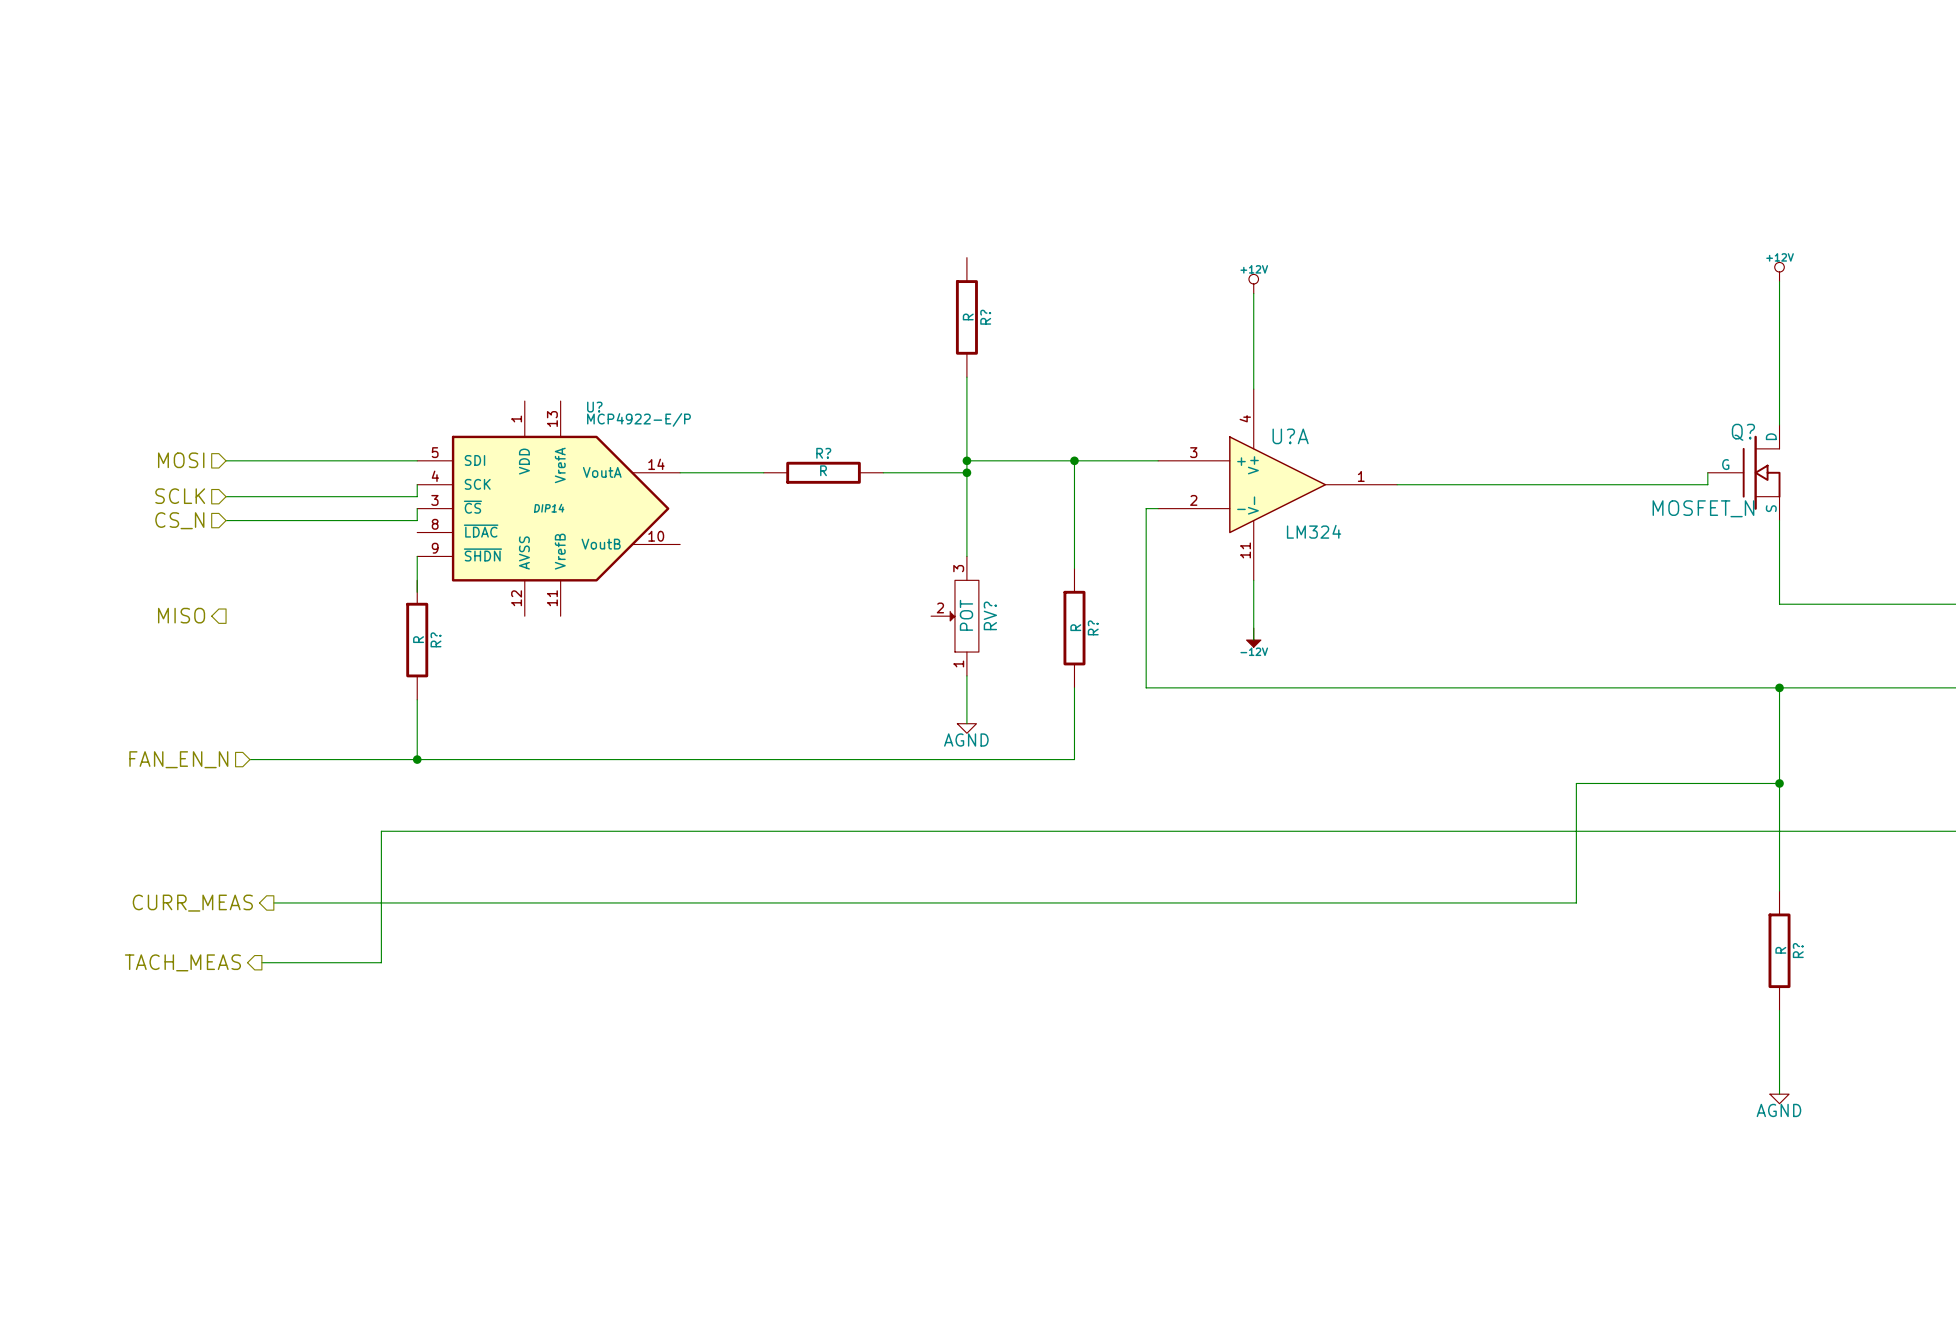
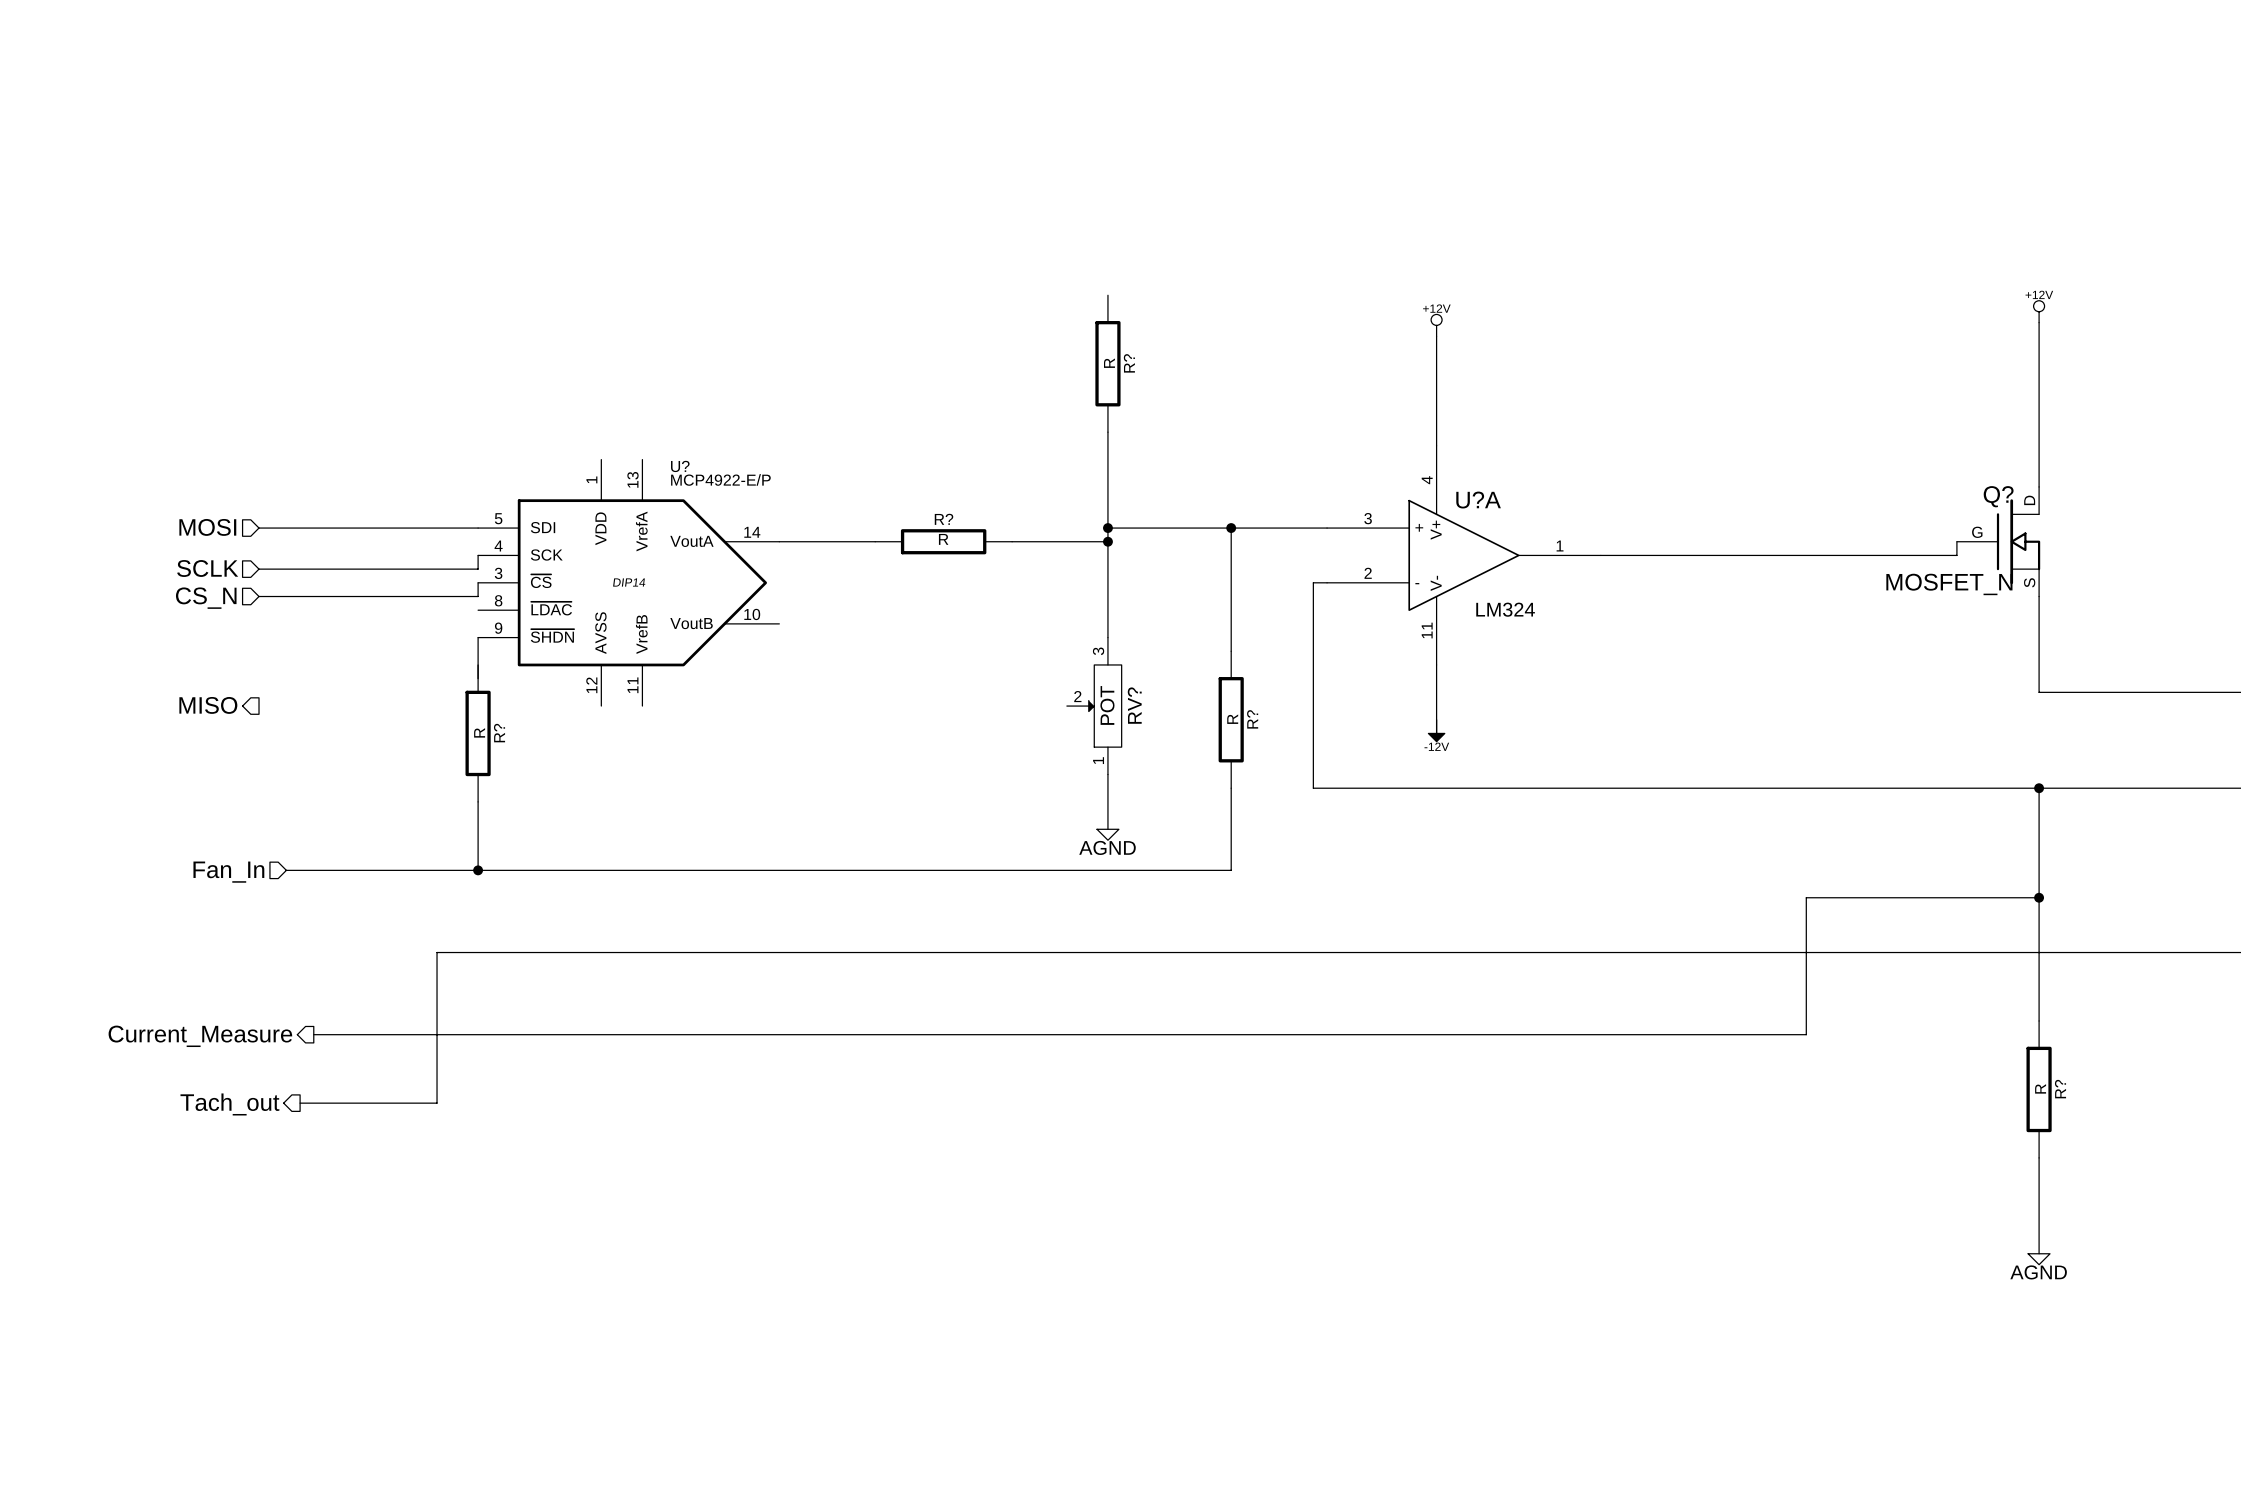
hierarchical label: FAN_EN_N (178, 759) -> Fan_In (228, 872)
hierarchical label: CURR_MEAS (192, 903) -> Current_Measure (200, 1036)
hierarchical label: TACH_MEAS (182, 962) -> Tach_out (229, 1104)

